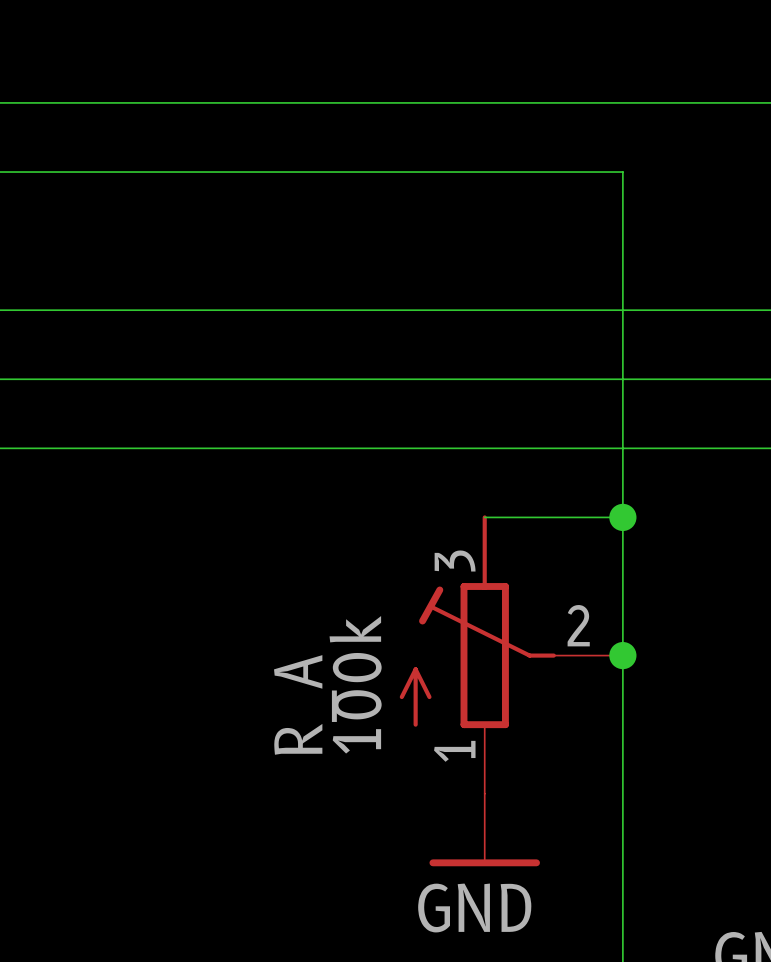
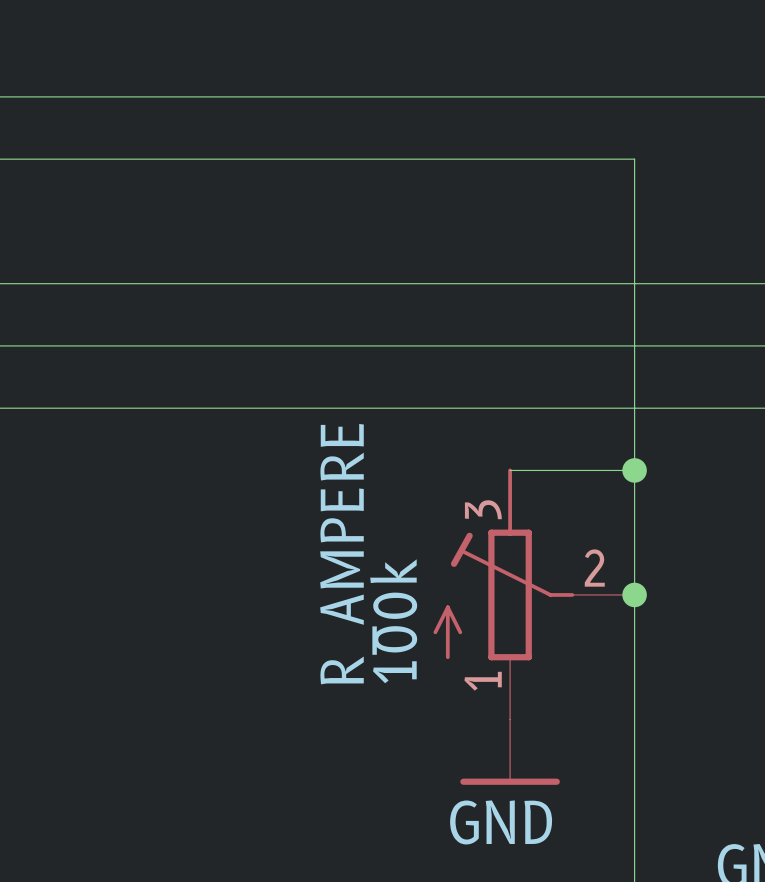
R_A name: R_A (305, 704) -> R_AMPERE (348, 554)

